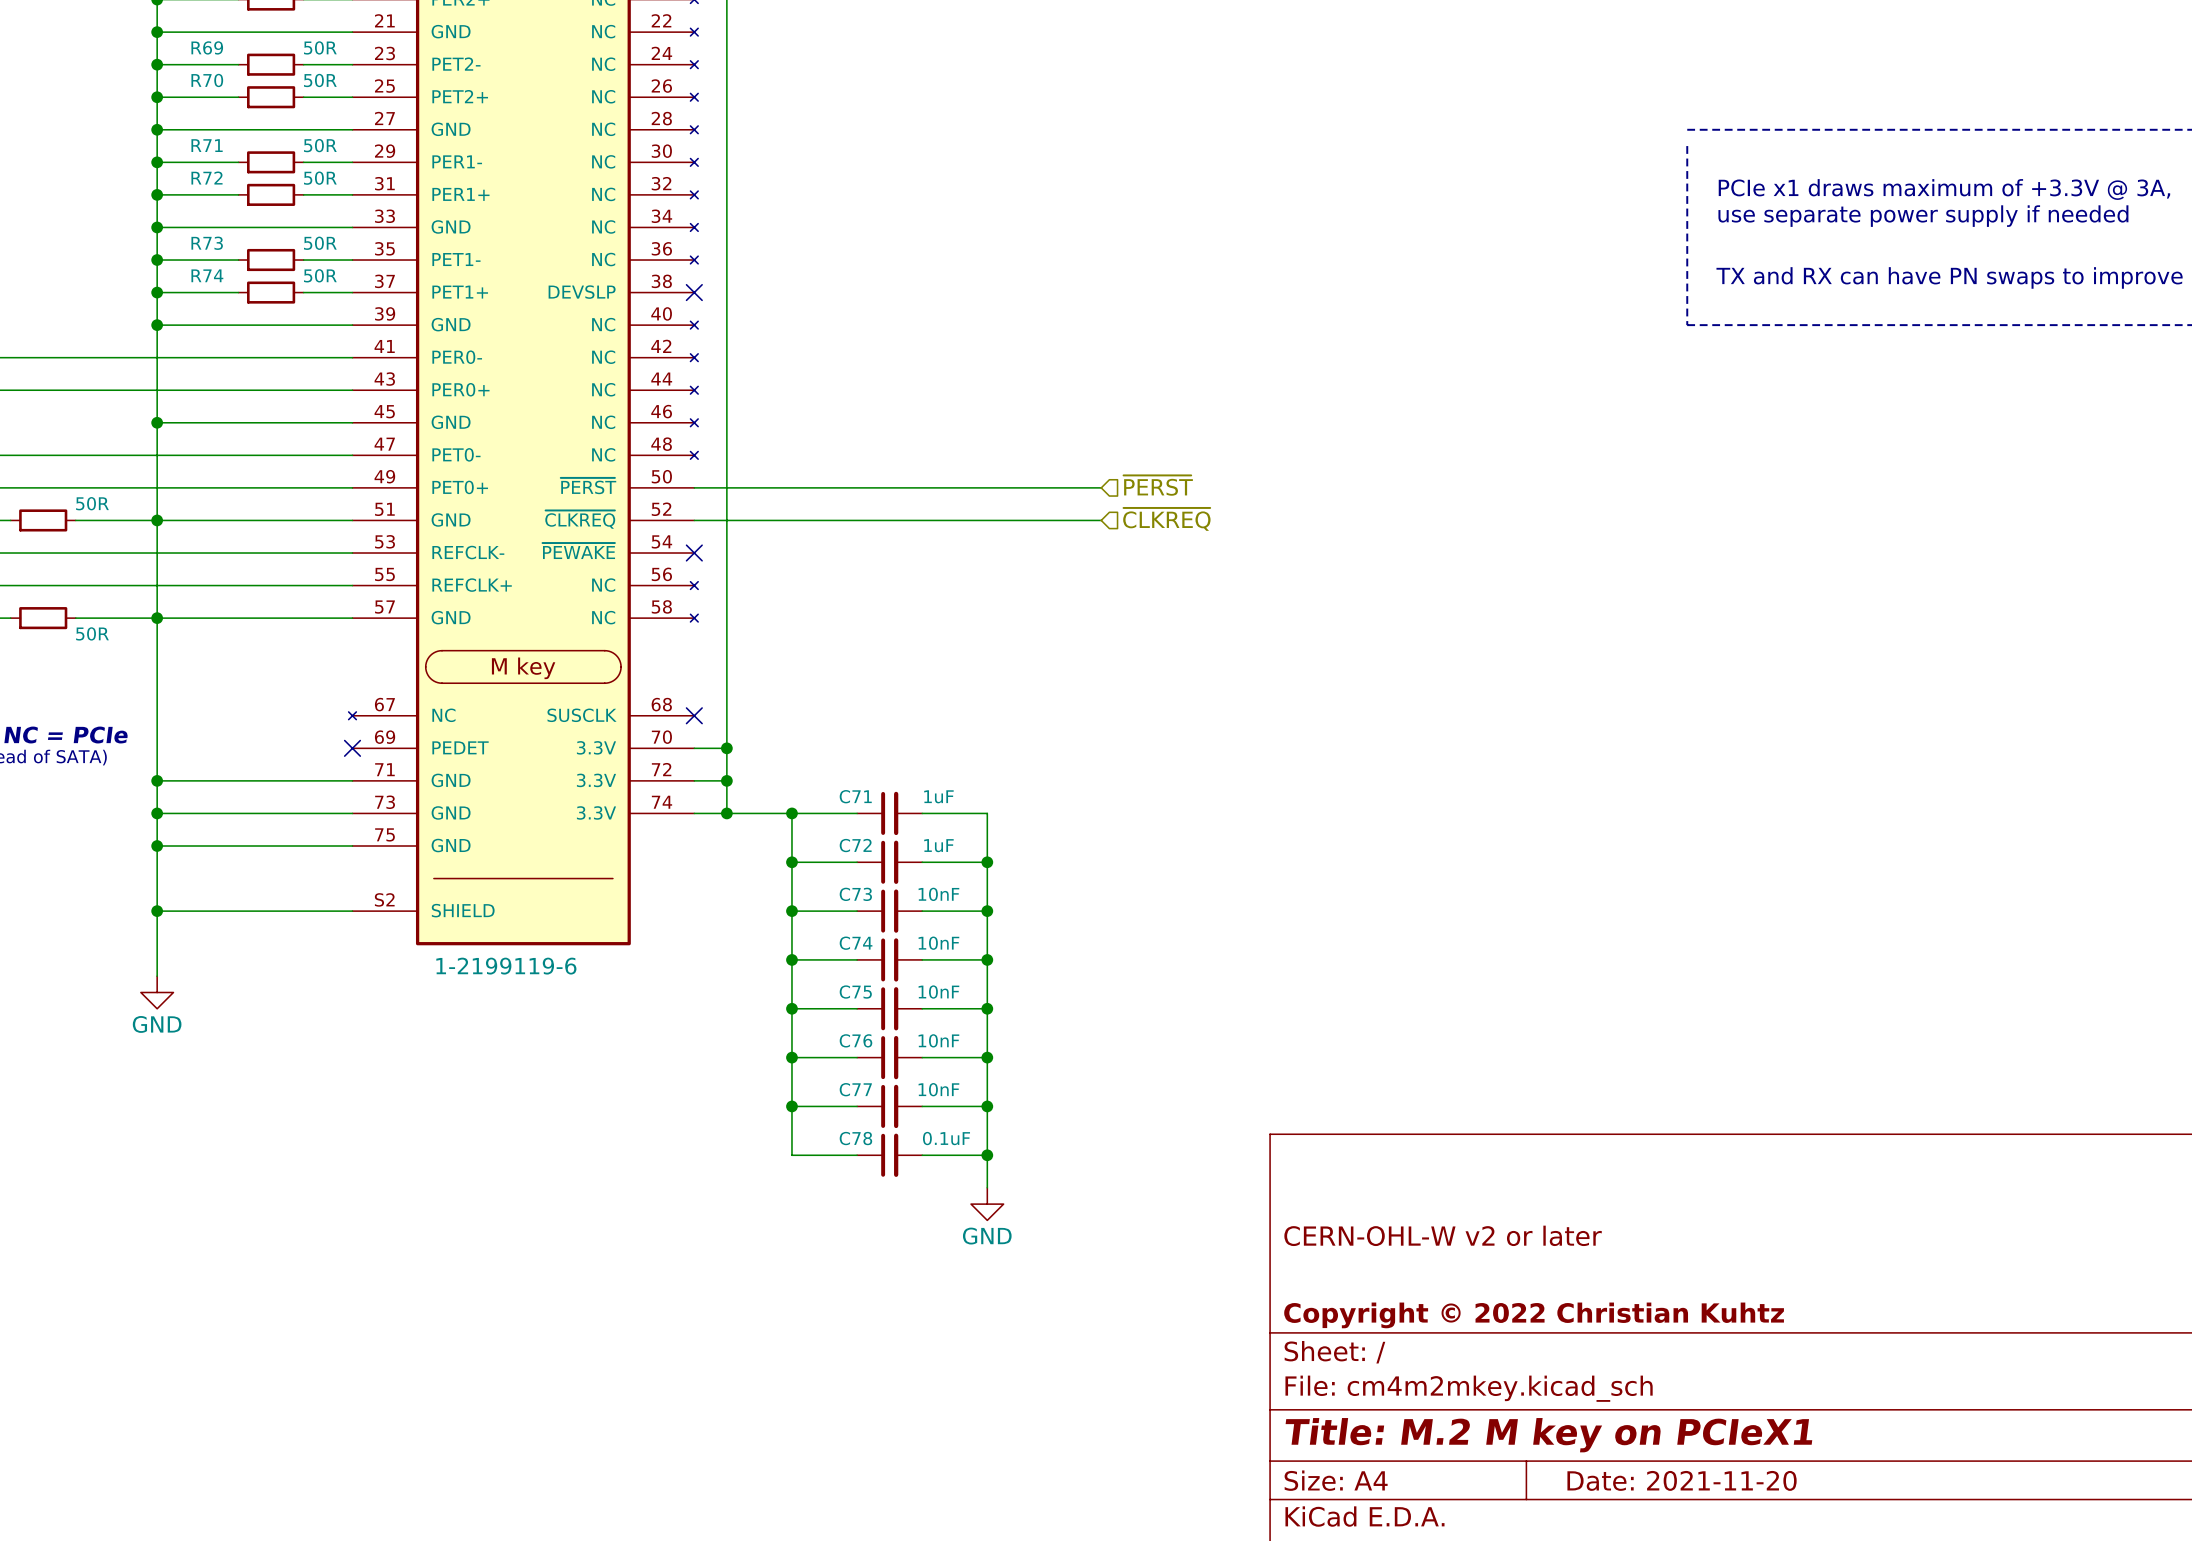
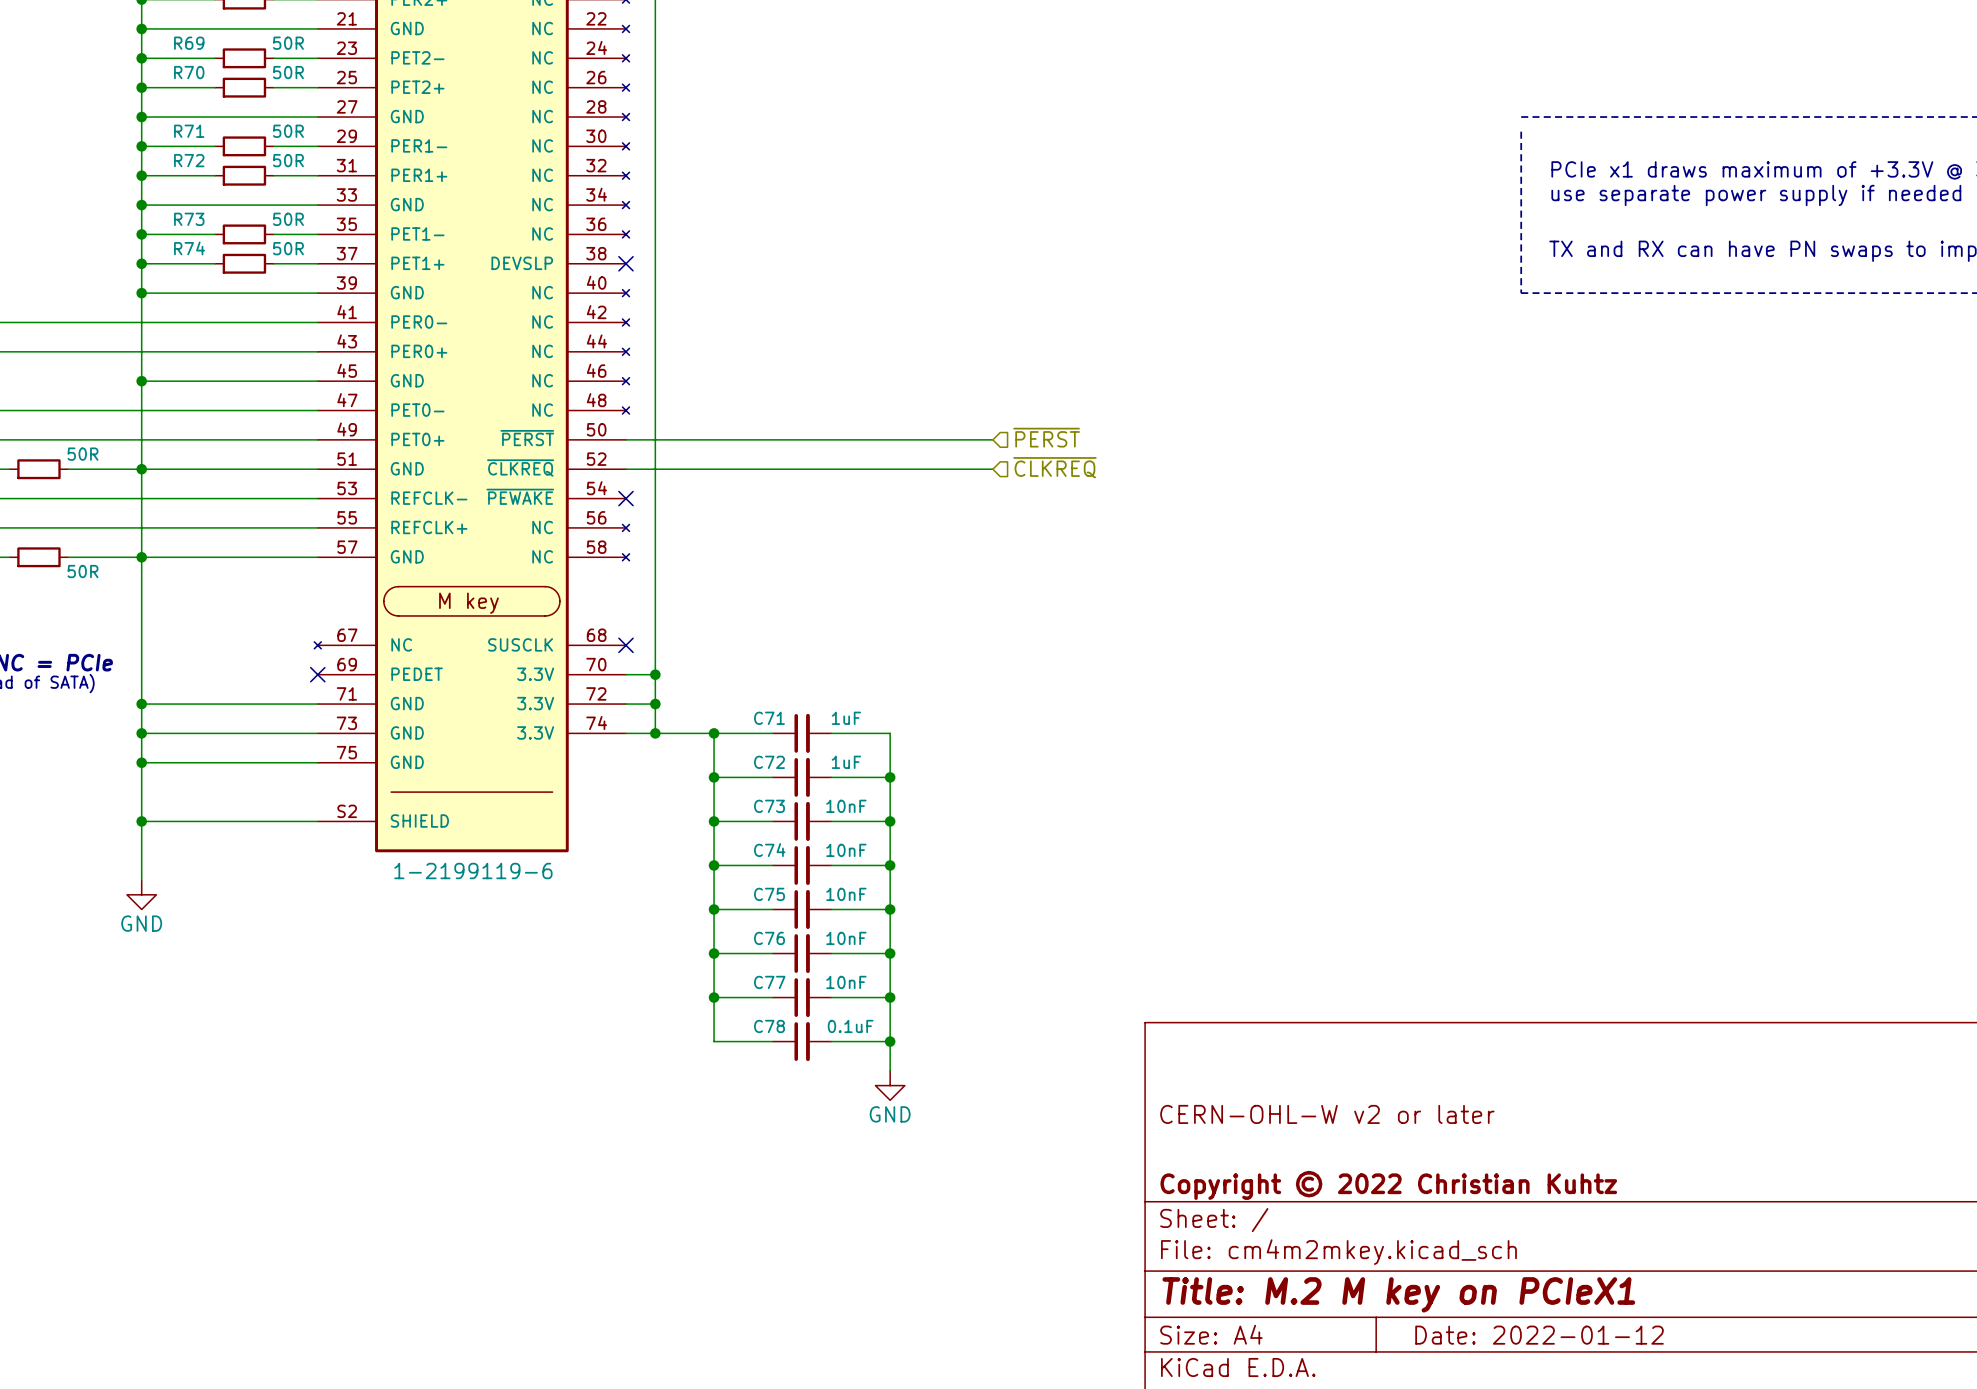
title block: Date: 2021-11-20 (1682, 1480) -> Date: 2022-01-12 (1539, 1335)

